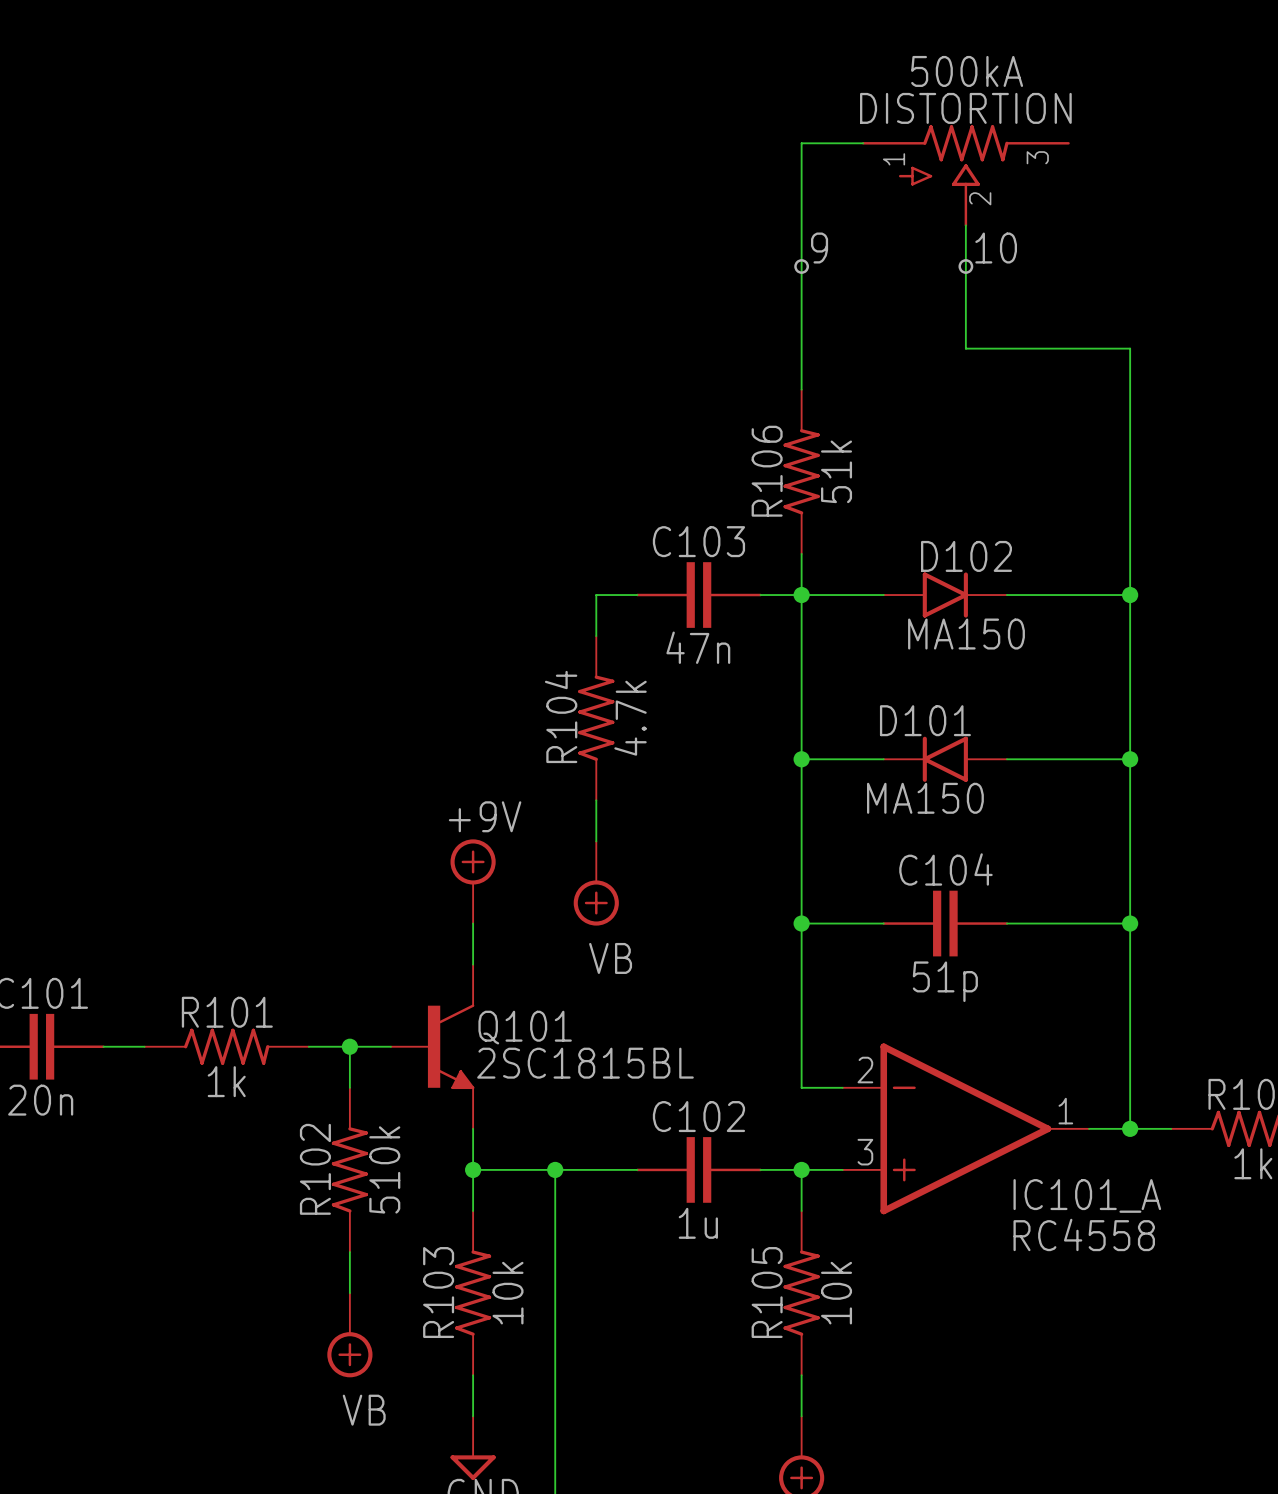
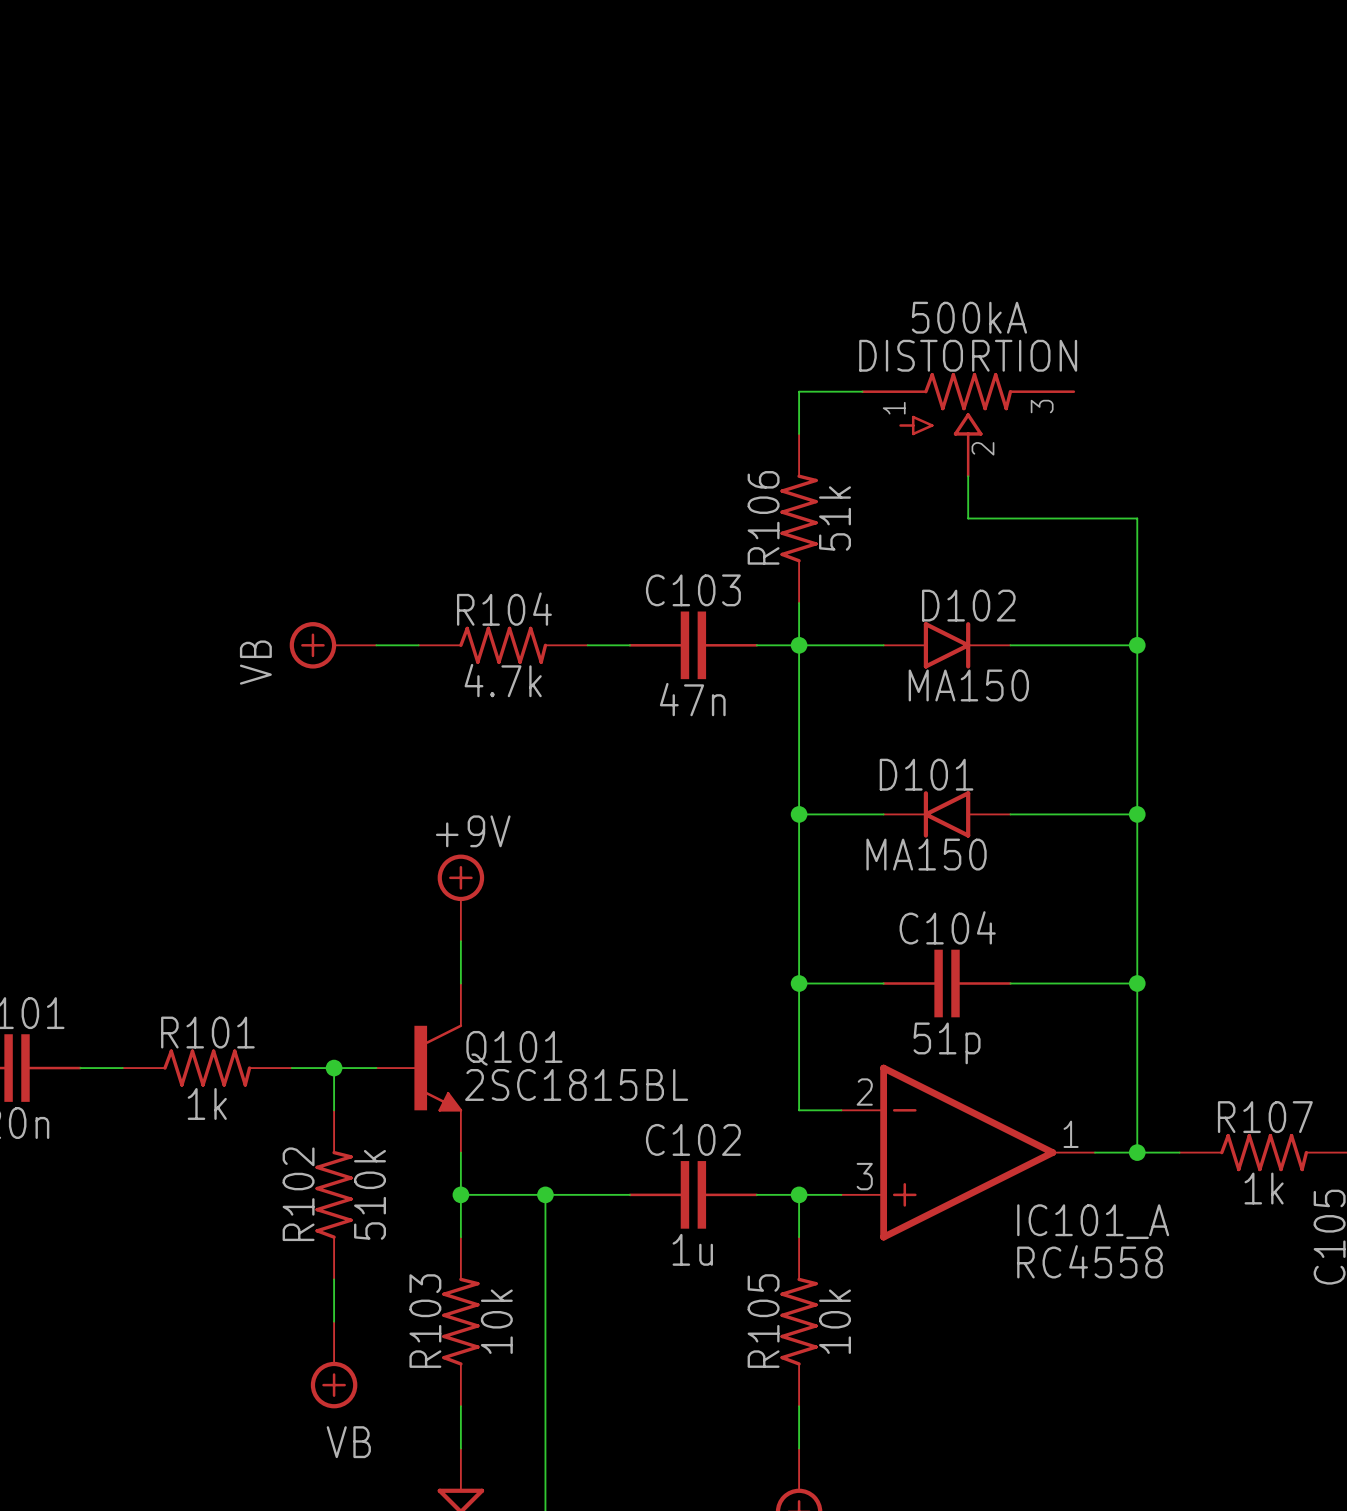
wire: (863, 143) (801, 143) (801, 389) -> none
DISTORTION position: (965, 175) -> (968, 425)
wire: (965, 225) (965, 348) (1130, 348) (1130, 512) -> (968, 476) (968, 518) (1137, 518)
text: 9 (819, 248) -> none
text: 10 (996, 248) -> none
drawing: [794, 259, 810, 274] -> none
drawing: [958, 259, 974, 274] -> none
wire: none -> (862, 391) (799, 391) (799, 433)
R106 position: (801, 471) -> (799, 518)
wire: (637, 595) (596, 595) (596, 636) -> (629, 645) (587, 645)
C103 position: (698, 595) -> (693, 645)
wire: (760, 595) (883, 595) -> (756, 645) (883, 645)
junction position: (801, 595) -> (799, 645)
D102 position: (945, 595) -> (947, 645)
wire: (1006, 595) (1130, 595) -> (1010, 645) (1137, 645)
junction position: (1130, 595) -> (1137, 645)
wire: none -> (376, 645) (418, 645)
R104 rotation: 0° (596, 718) -> 90° clockwise (503, 645)
R104 position: (596, 718) -> (503, 645)
wire: (801, 759) (883, 759) -> (799, 814) (883, 814)
junction position: (801, 759) -> (799, 814)
D101 position: (945, 759) -> (947, 814)
wire: (1006, 759) (1130, 759) -> (1010, 814) (1137, 814)
junction position: (1130, 759) -> (1137, 814)
wire: (596, 800) (596, 841) -> none
power symbol position: VB (596, 883) -> VB (333, 645)
power symbol rotation: 0° (596, 903) -> 90° clockwise (312, 645)
wire: (801, 923) (883, 923) -> (799, 983) (883, 983)
junction position: (801, 923) -> (799, 983)
C104 position: (945, 923) -> (947, 983)
wire: (1006, 923) (1130, 923) -> (1010, 983) (1137, 983)
junction position: (1130, 923) -> (1137, 983)

